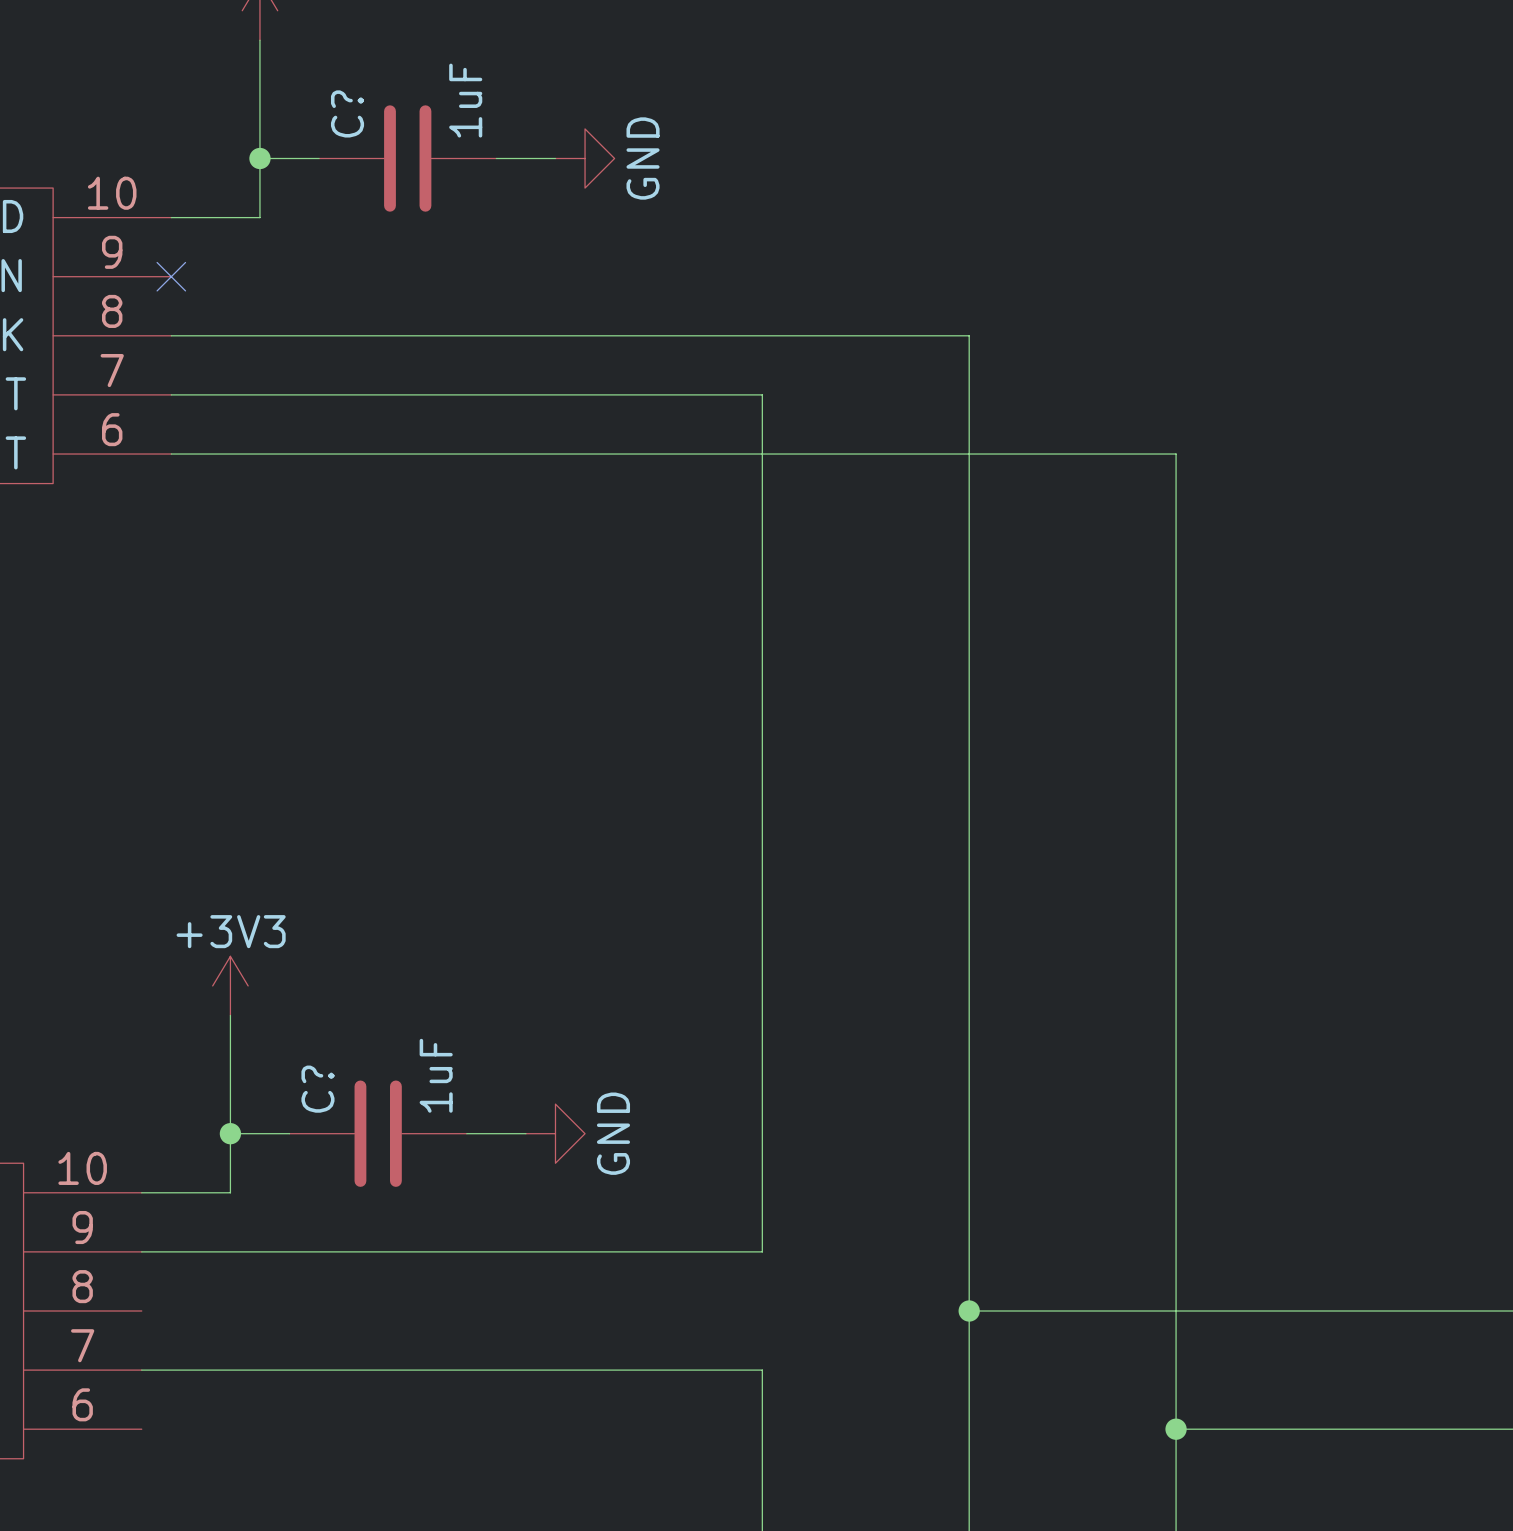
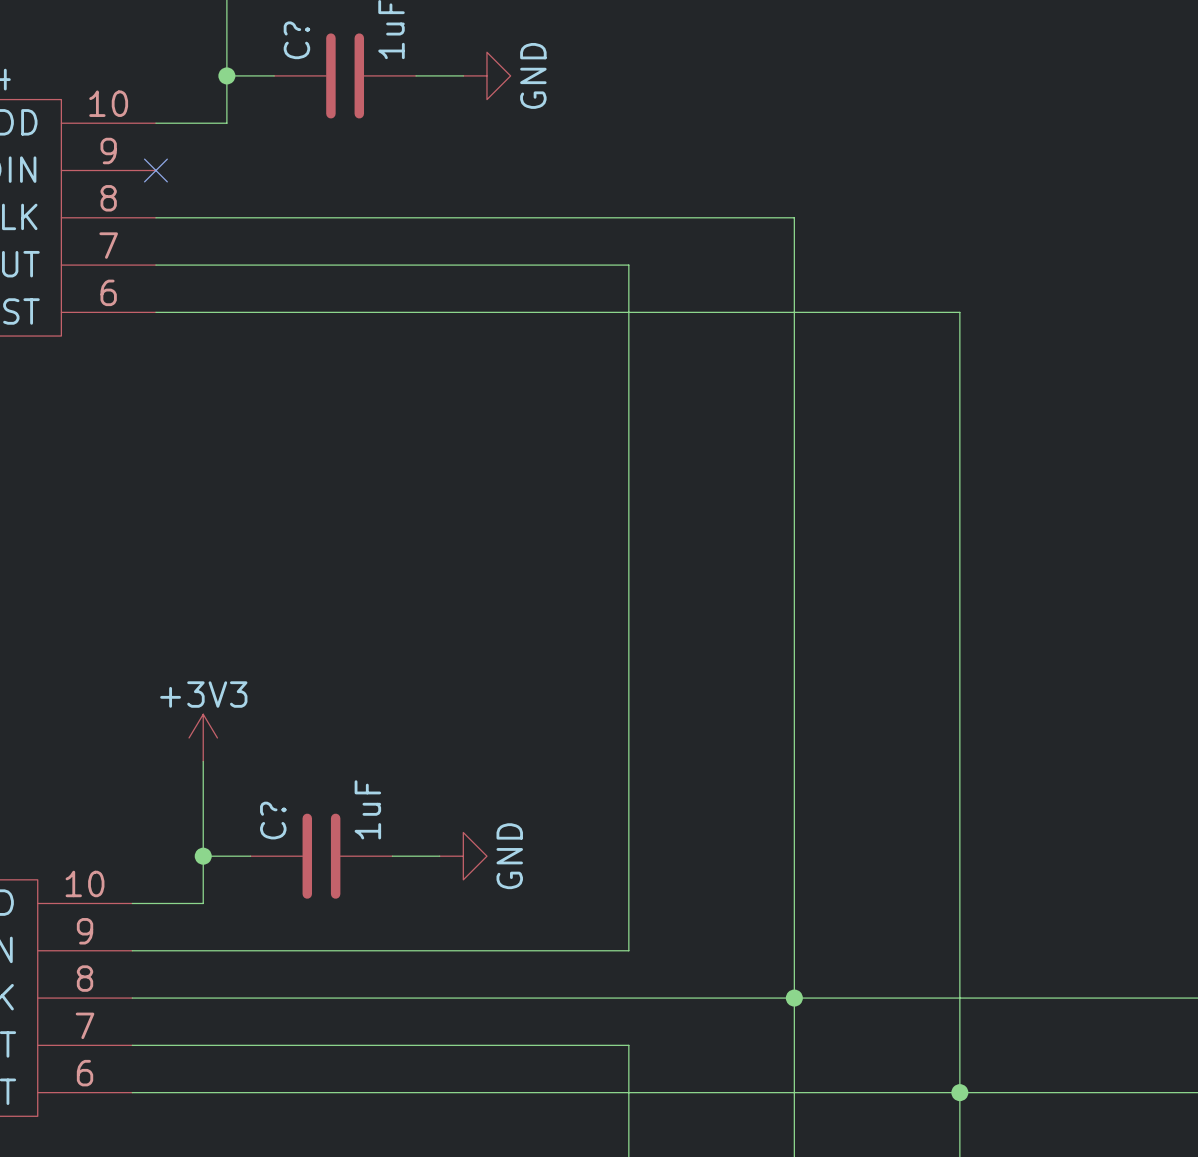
wire: none -> (132, 998) (794, 998)
wire: none -> (132, 1092) (959, 1092)

